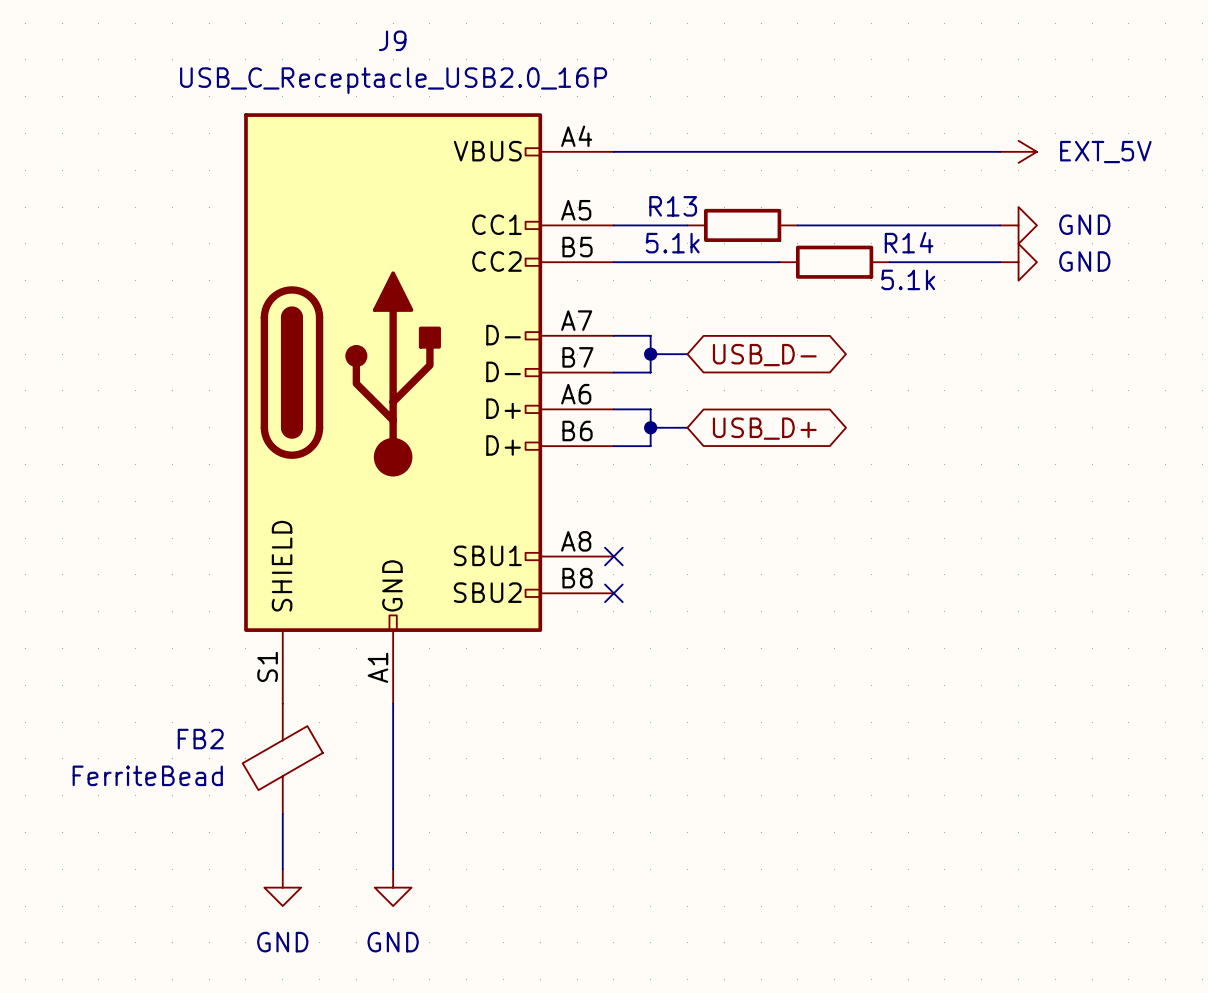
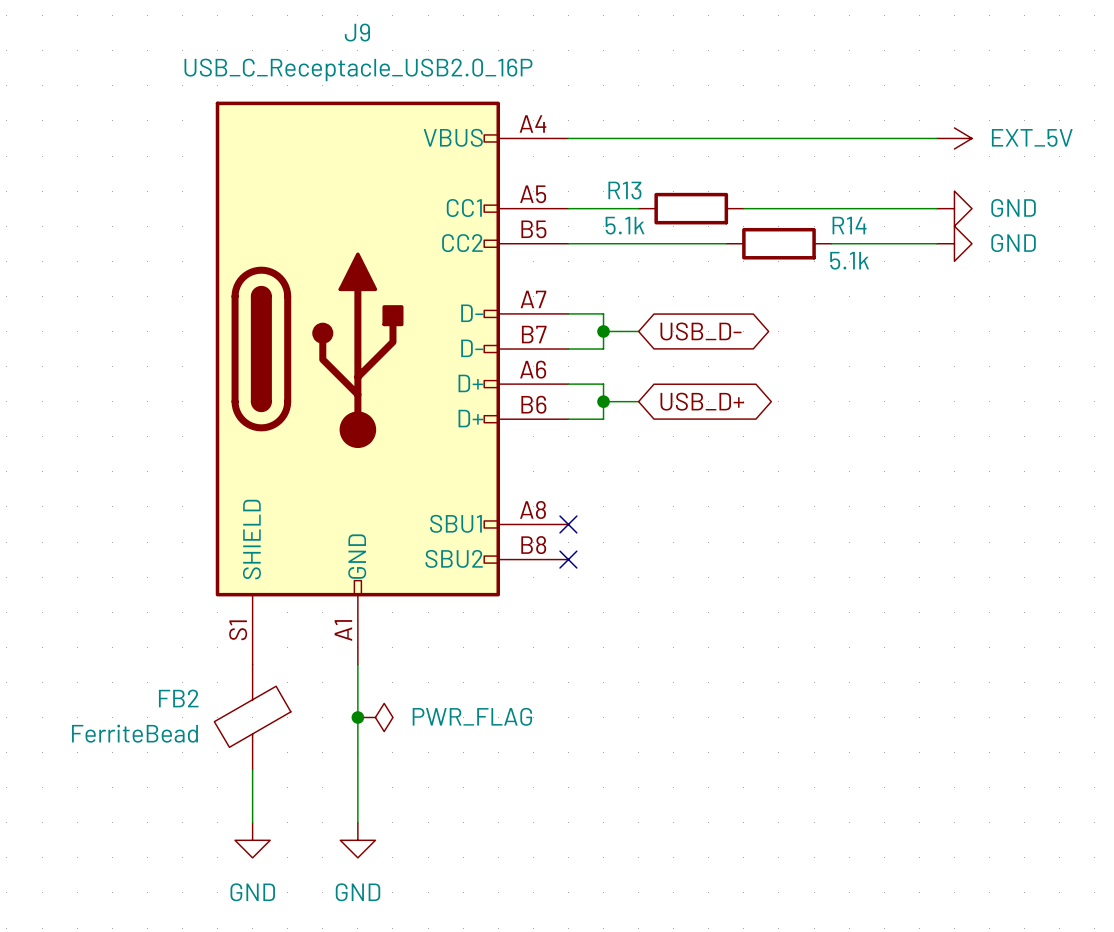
junction: none -> (357, 717)
power symbol: none -> PWR_FLAG (375, 717)

